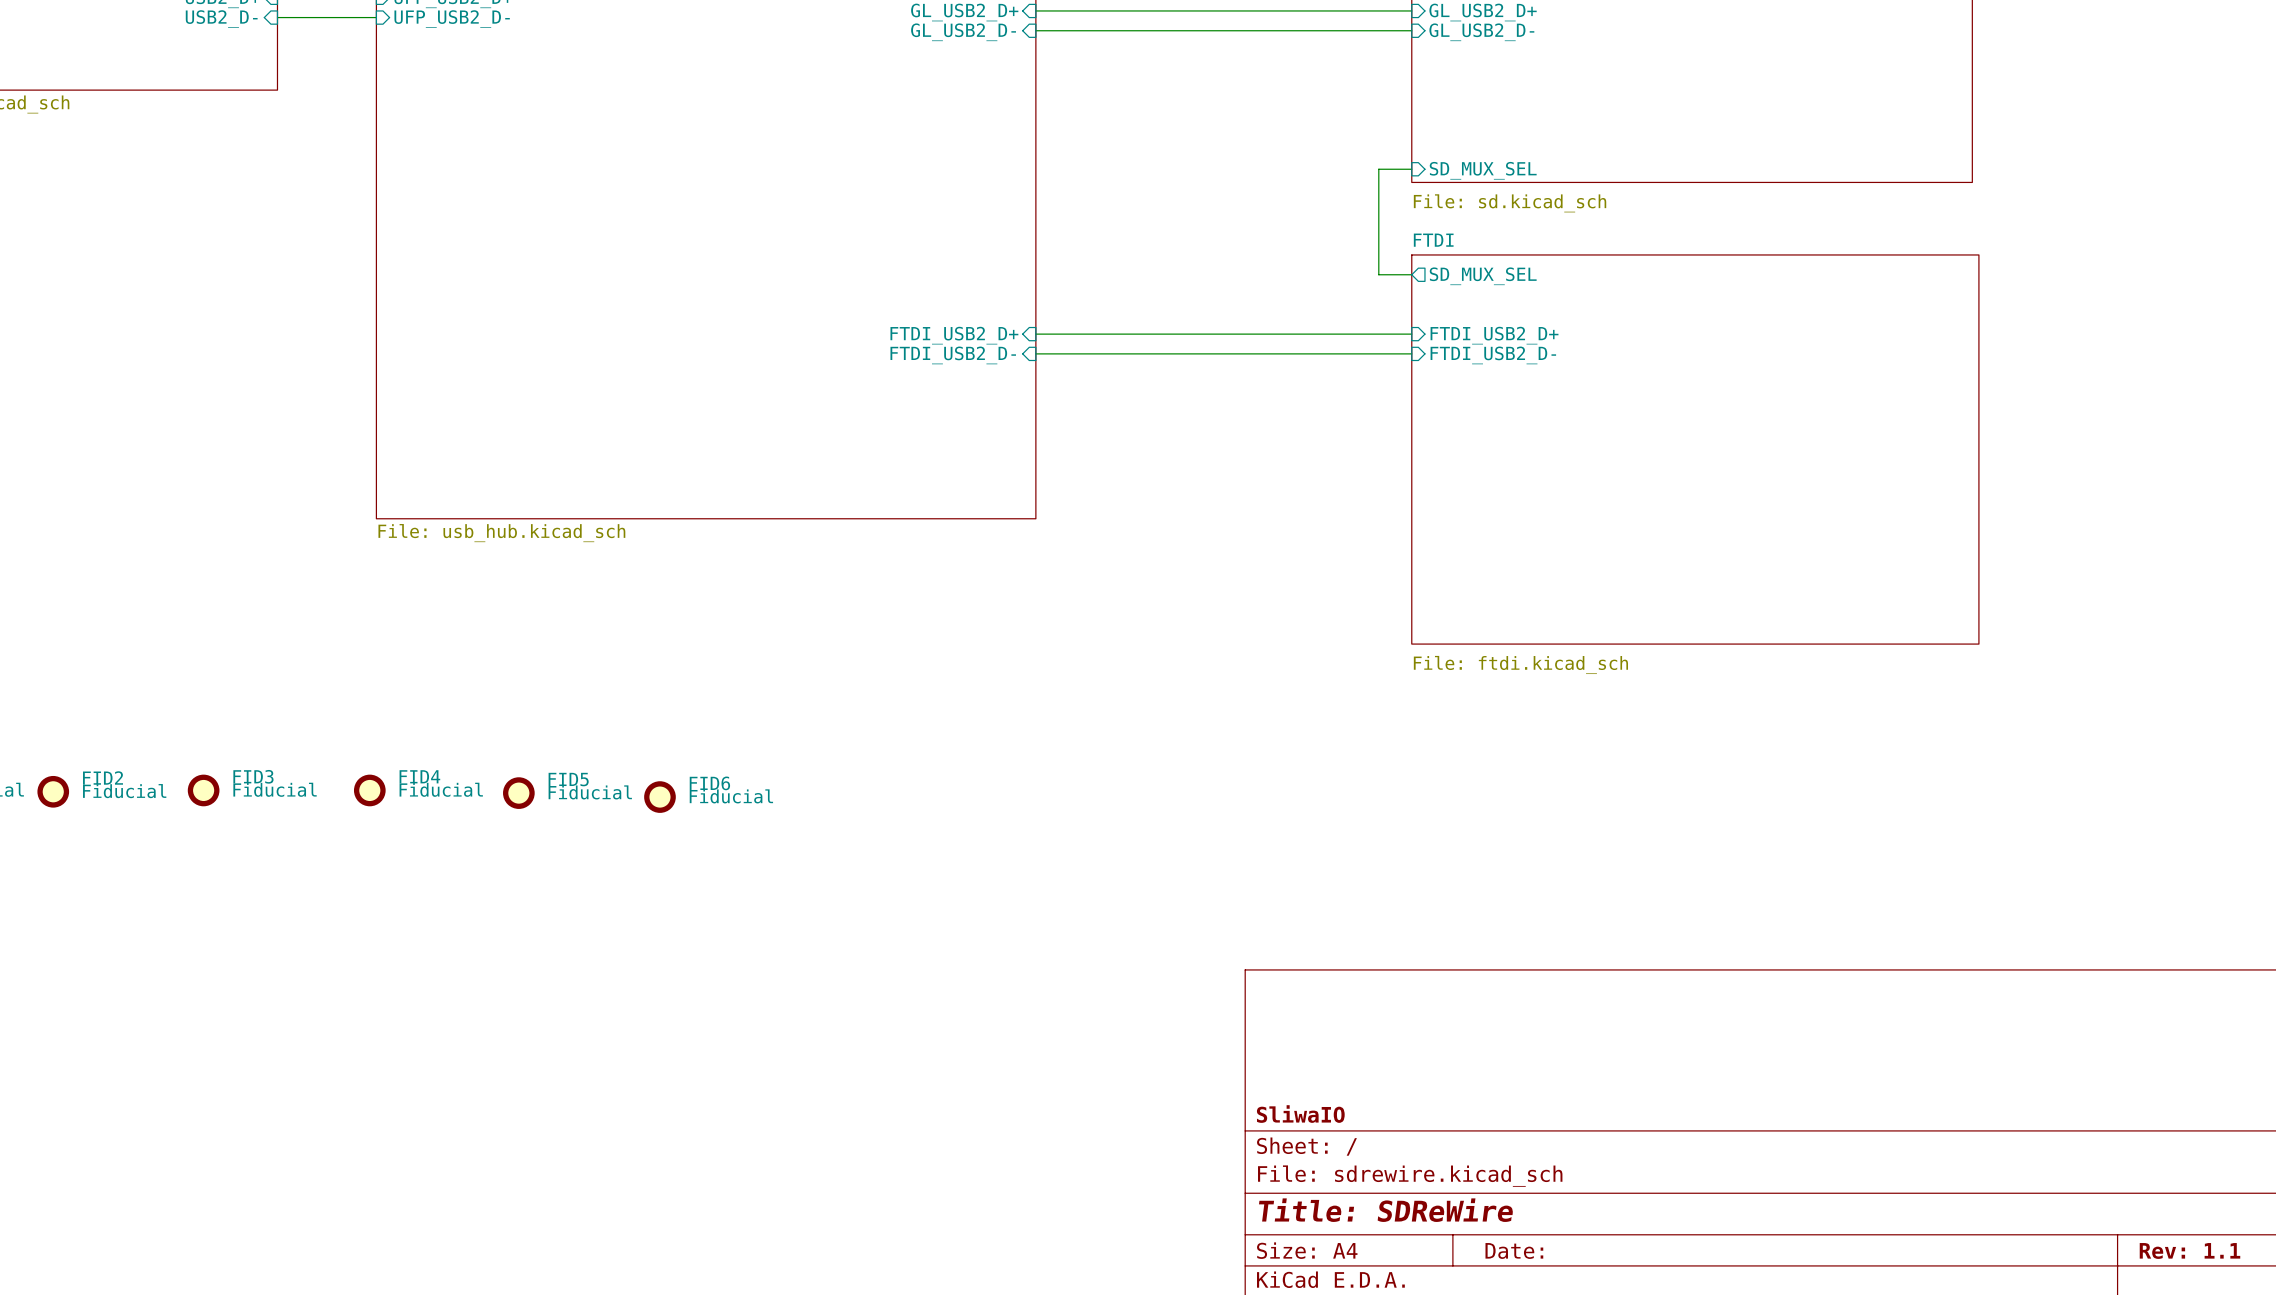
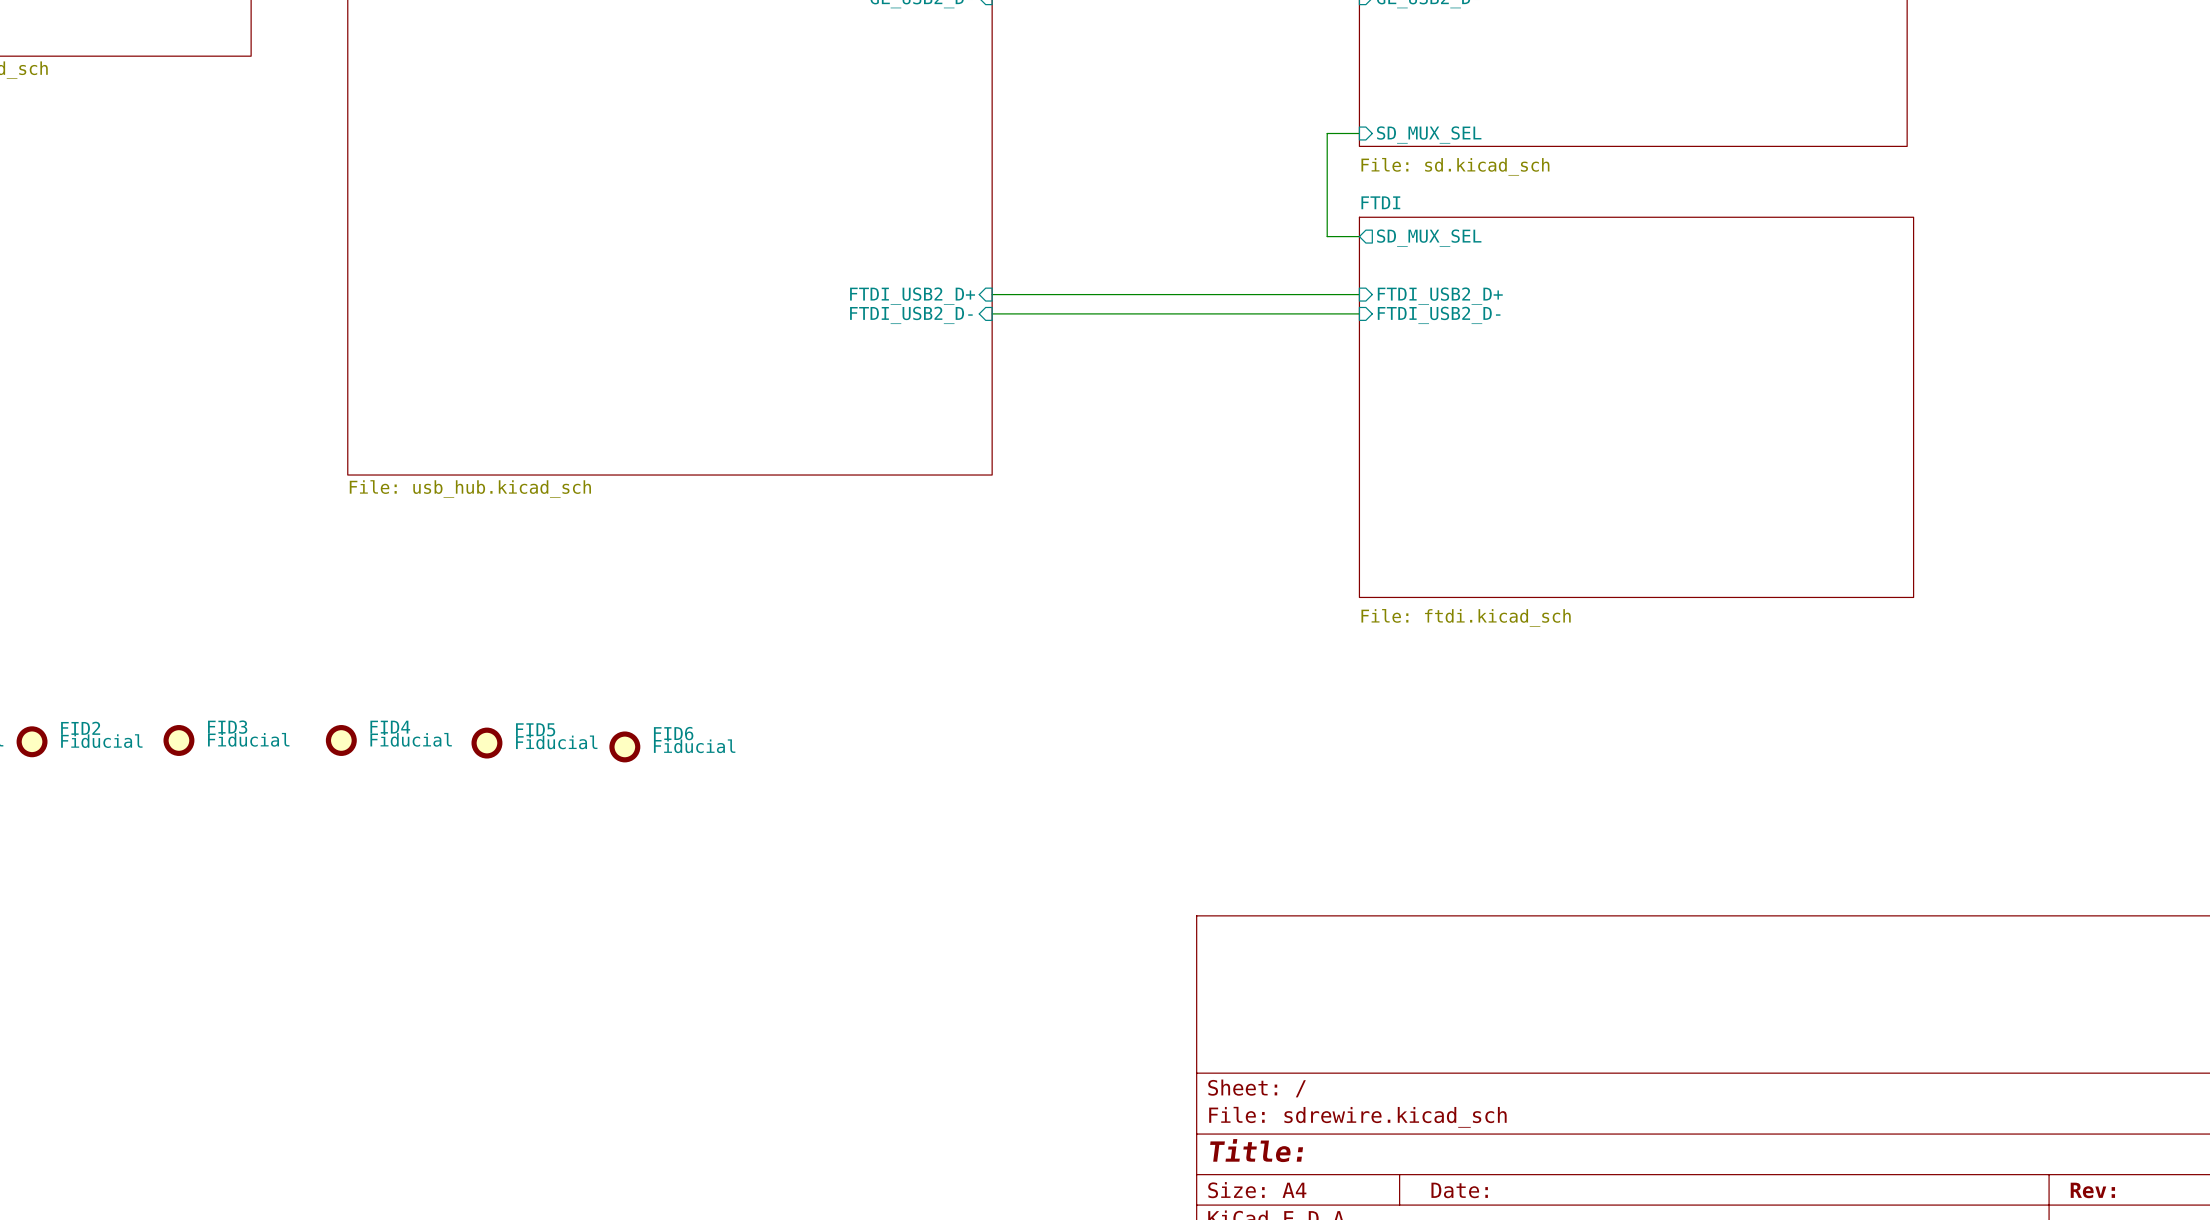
title block: SliwaIO (1300, 1114) -> none
title block: Title: SDReWire (1386, 1210) -> Title: (1256, 1150)
title block: Rev: 1.1 (2189, 1250) -> Rev: (2092, 1190)

